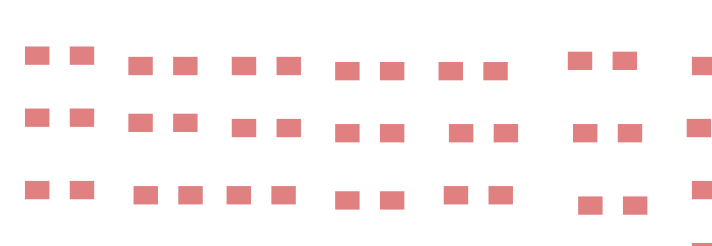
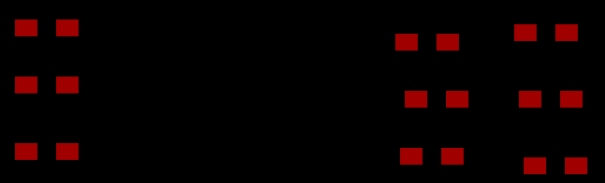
part: (162, 65) -> none
part: (266, 65) -> none
part: (369, 71) -> none
part: (162, 122) -> none
part: (266, 128) -> none
part: (369, 133) -> none
part: (168, 195) -> none
part: (261, 195) -> none
part: (369, 200) -> none

